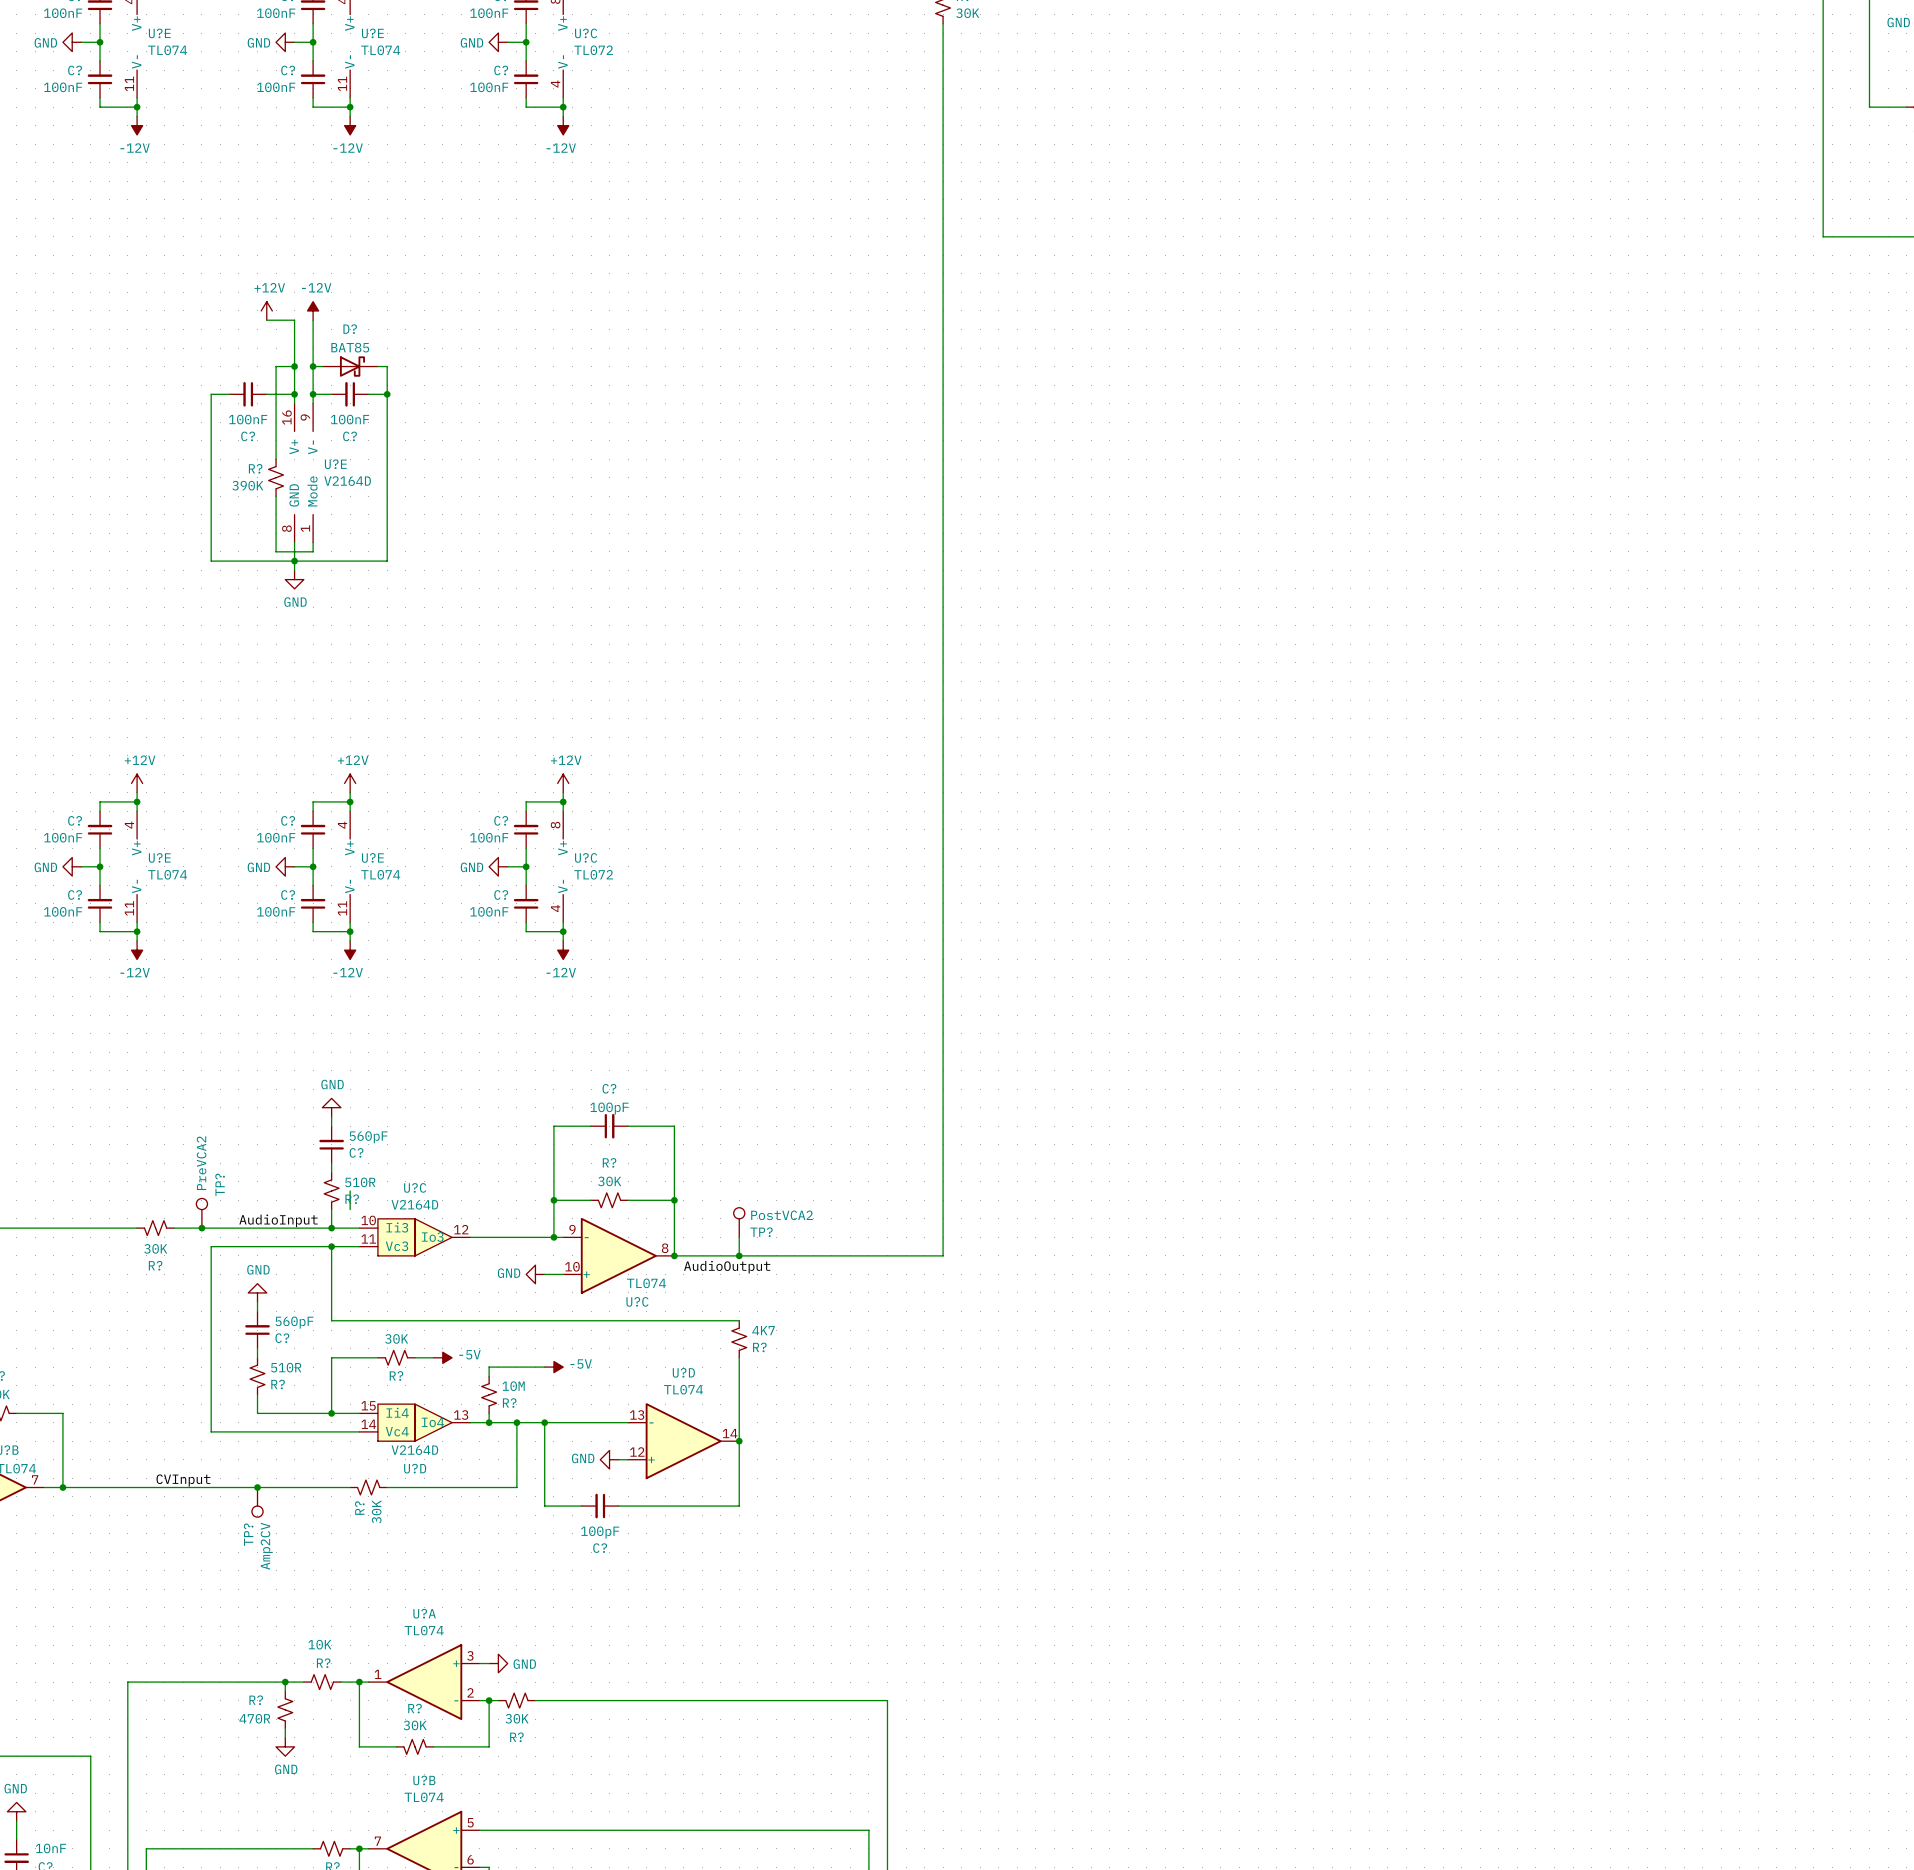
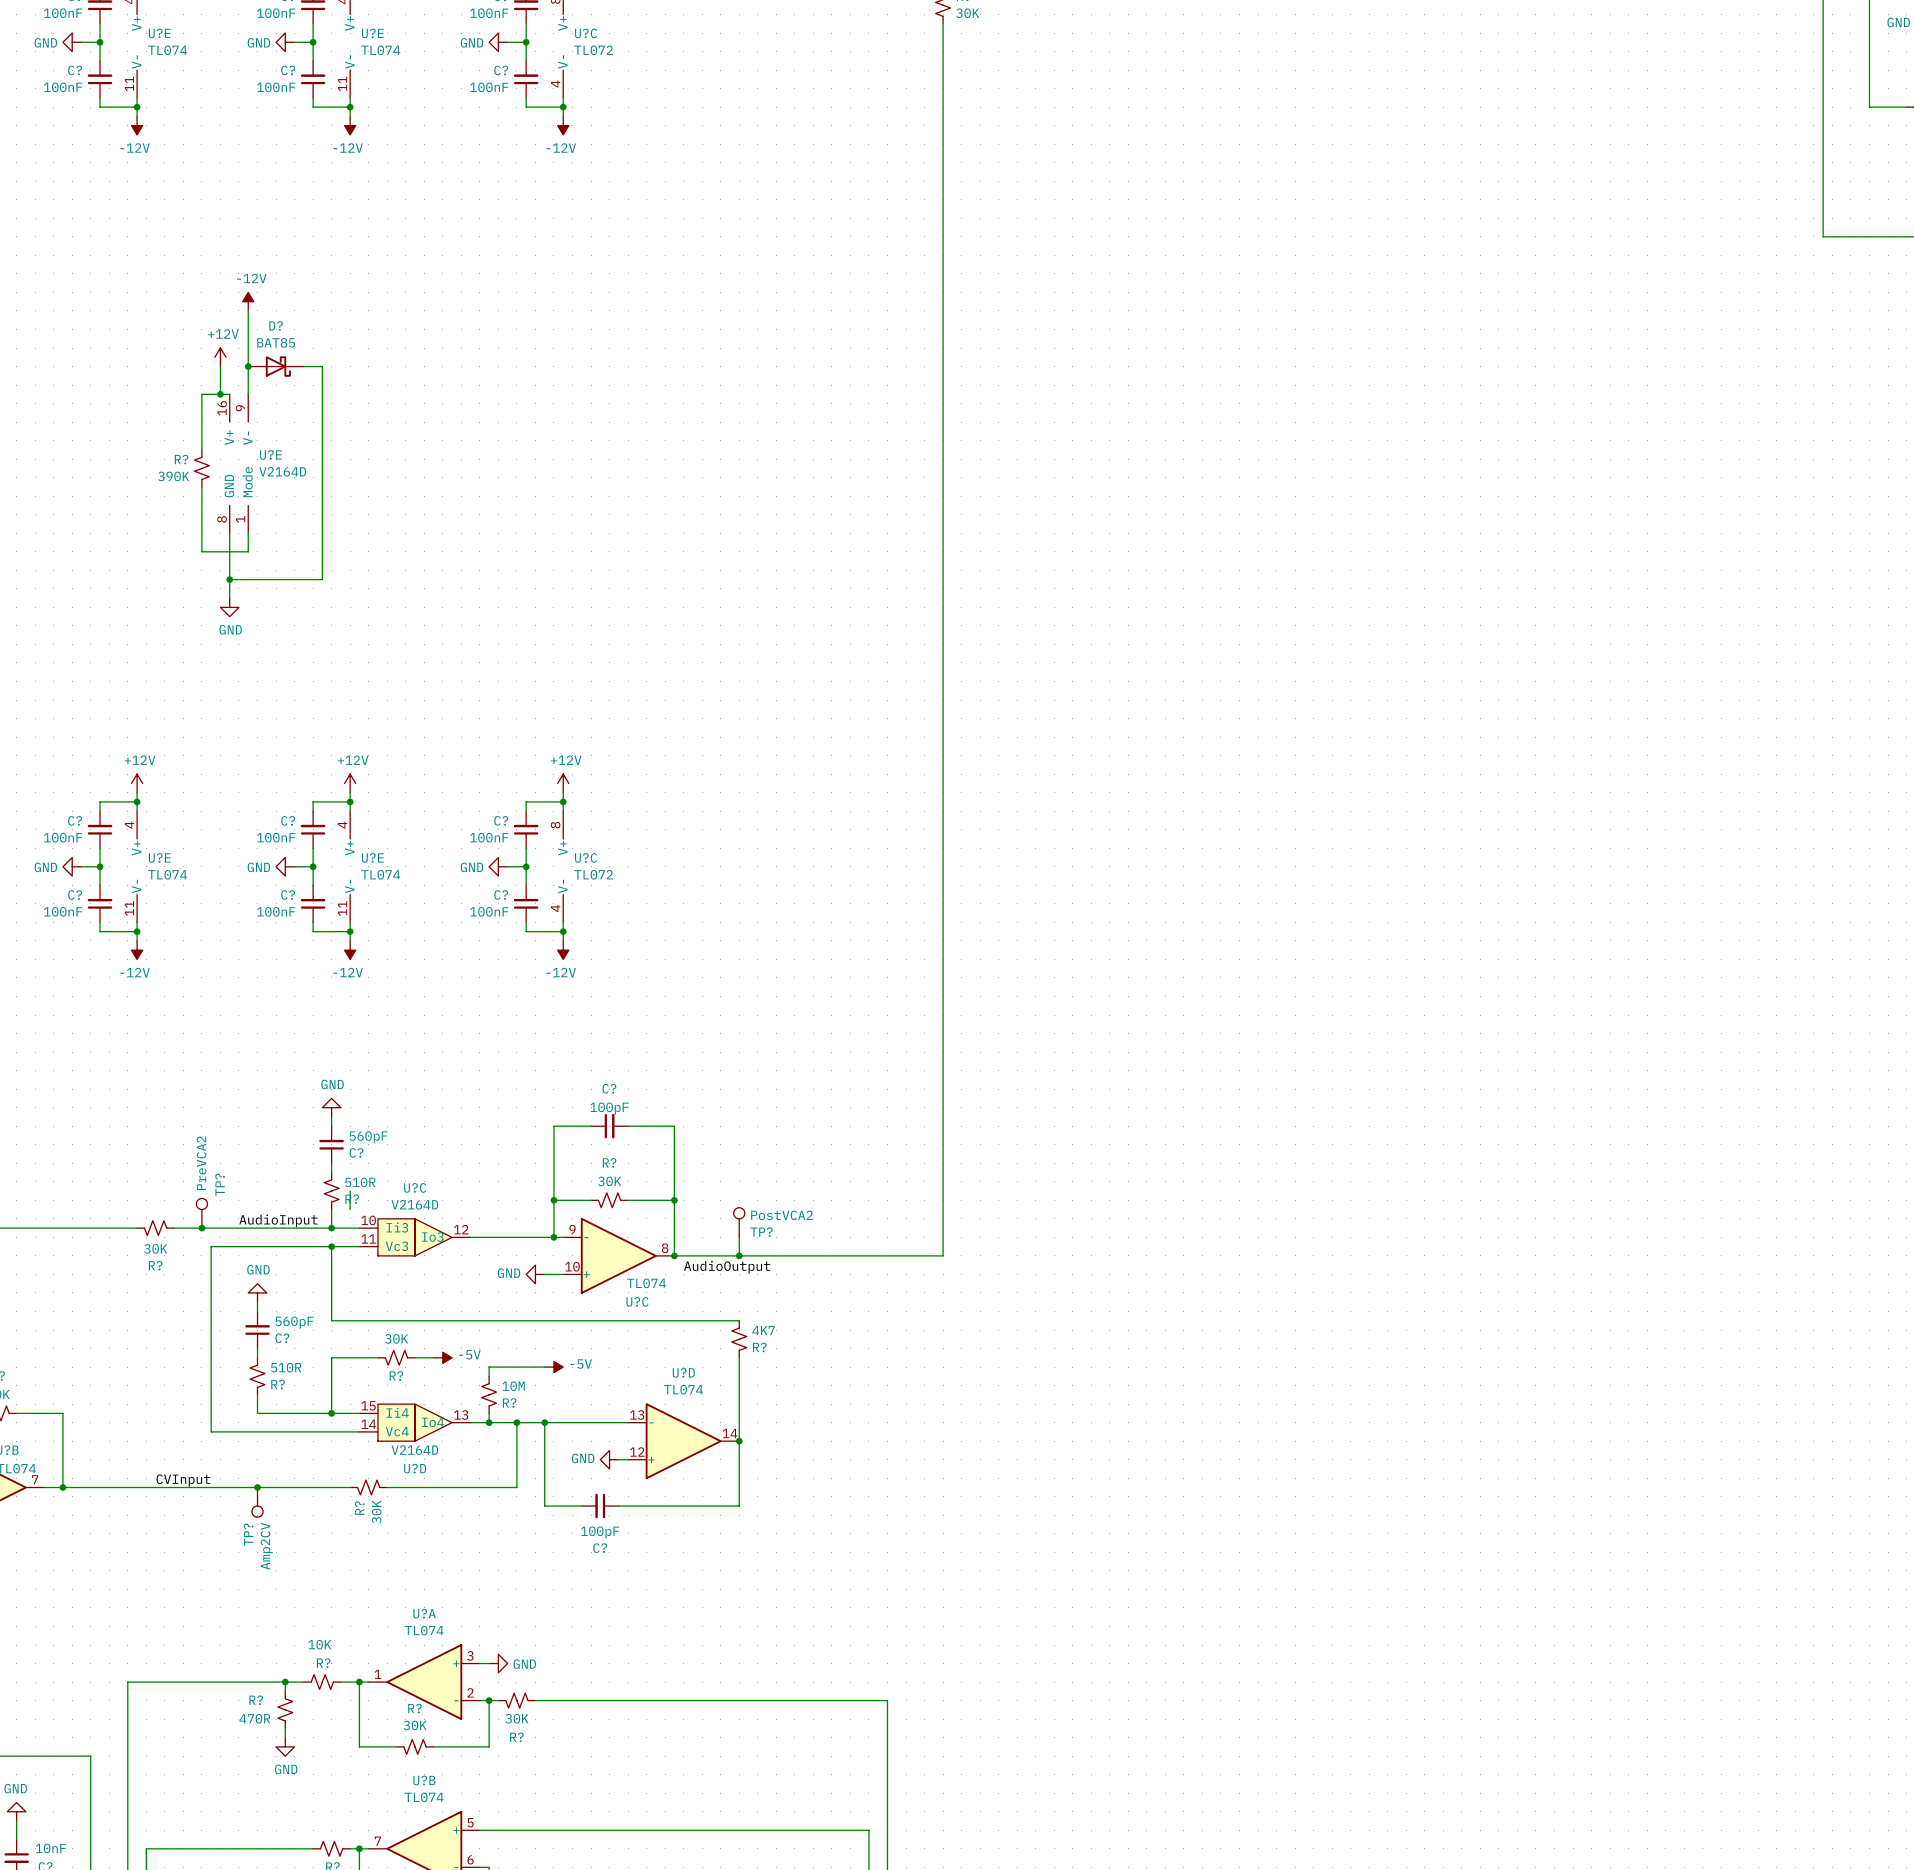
power symbol position: +12V (266, 310) -> +12V (220, 357)
power symbol position: -12V (313, 310) -> -12V (248, 301)
wire: (266, 320) (294, 320) (294, 403) -> none
wire: (313, 320) (313, 403) -> (248, 310) (248, 394)
wire: none -> (220, 366) (220, 394)
junction: none -> (248, 366)
D?: none -> BAT85 (276, 366)
wire: (294, 366) (276, 366) (276, 459) -> none
junction: (294, 366) -> none
wire: none -> (303, 366) (313, 366)
junction: (313, 366) -> none
wire: none -> (322, 366) (322, 579) (229, 579)
D?: BAT85 (350, 366) -> none
wire: (377, 366) (387, 366) (387, 561) (211, 561) (211, 394) -> (201, 449) (201, 394) (211, 394)
junction: none -> (220, 394)
C?: 100nF (248, 394) -> none
wire: (266, 394) (294, 394) -> none
junction: (294, 394) -> none
wire: (313, 394) (331, 394) -> none
junction: (313, 394) -> none
C?: 100nF (350, 394) -> none
wire: (368, 394) (387, 394) -> none
junction: (387, 394) -> none
U?E position: (303, 473) -> (238, 463)
R? position: (276, 477) -> (201, 468)
wire: none -> (201, 486) (201, 551) (248, 551) (248, 533)
wire: (276, 496) (276, 551) (313, 551) (313, 542) -> none
wire: none -> (229, 533) (229, 598)
wire: (294, 542) (294, 570) -> none
junction: (294, 561) -> none
junction: none -> (229, 579)
power symbol position: GND (294, 579) -> GND (229, 607)

